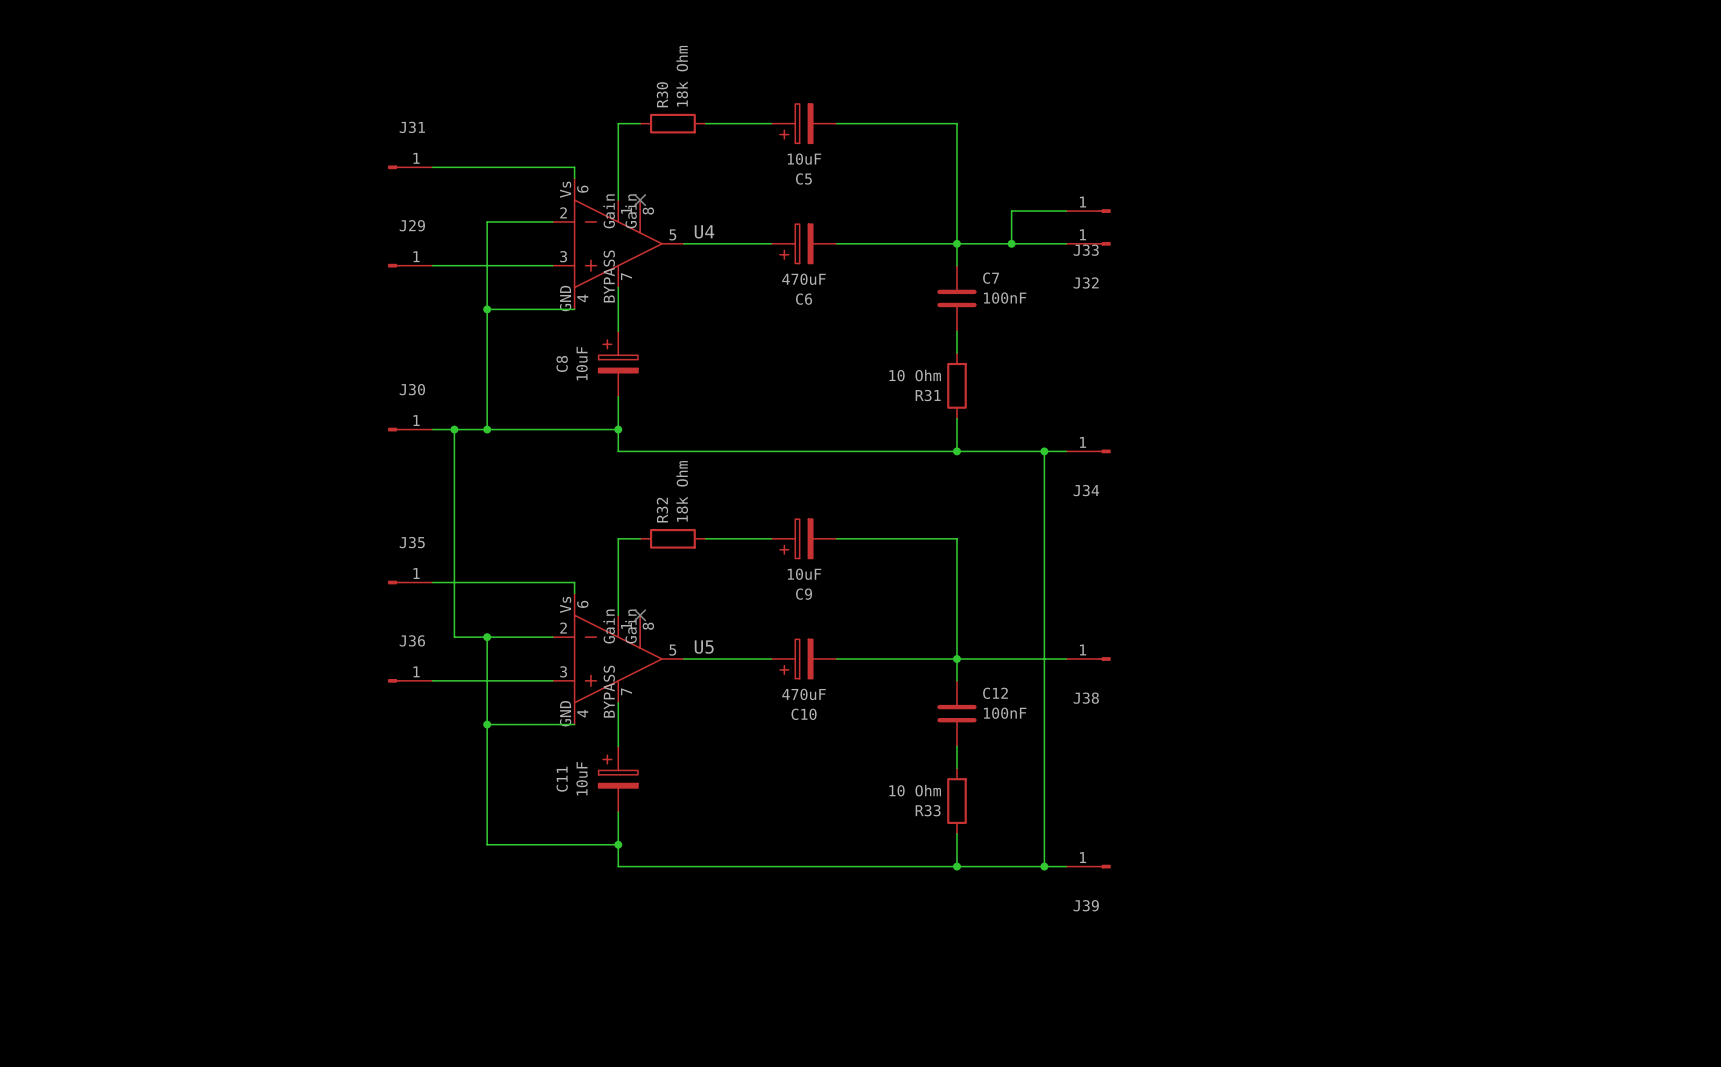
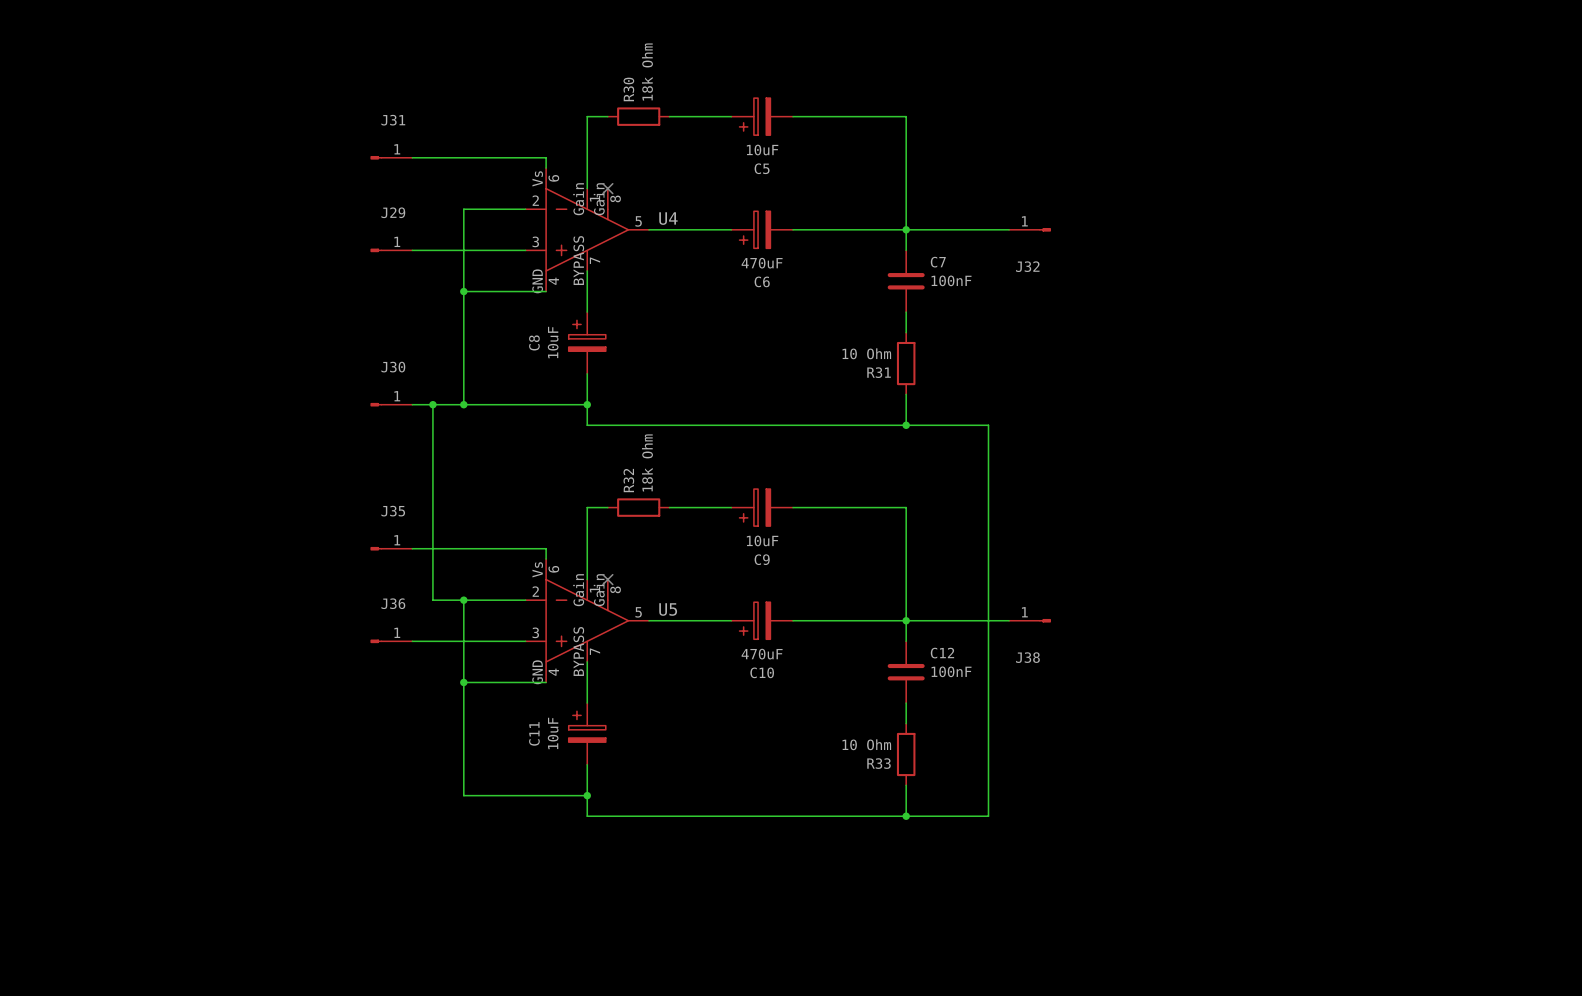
wire: (1066, 211) (1011, 211) (1011, 243) -> none
J33: (1088, 211) -> none
junction: (1011, 243) -> none
wire: (1044, 451) (1066, 451) -> none
junction: (1044, 451) -> none
J34: (1088, 451) -> none
wire: (1044, 866) (1066, 866) -> none
junction: (1044, 866) -> none
J39: (1088, 866) -> none

